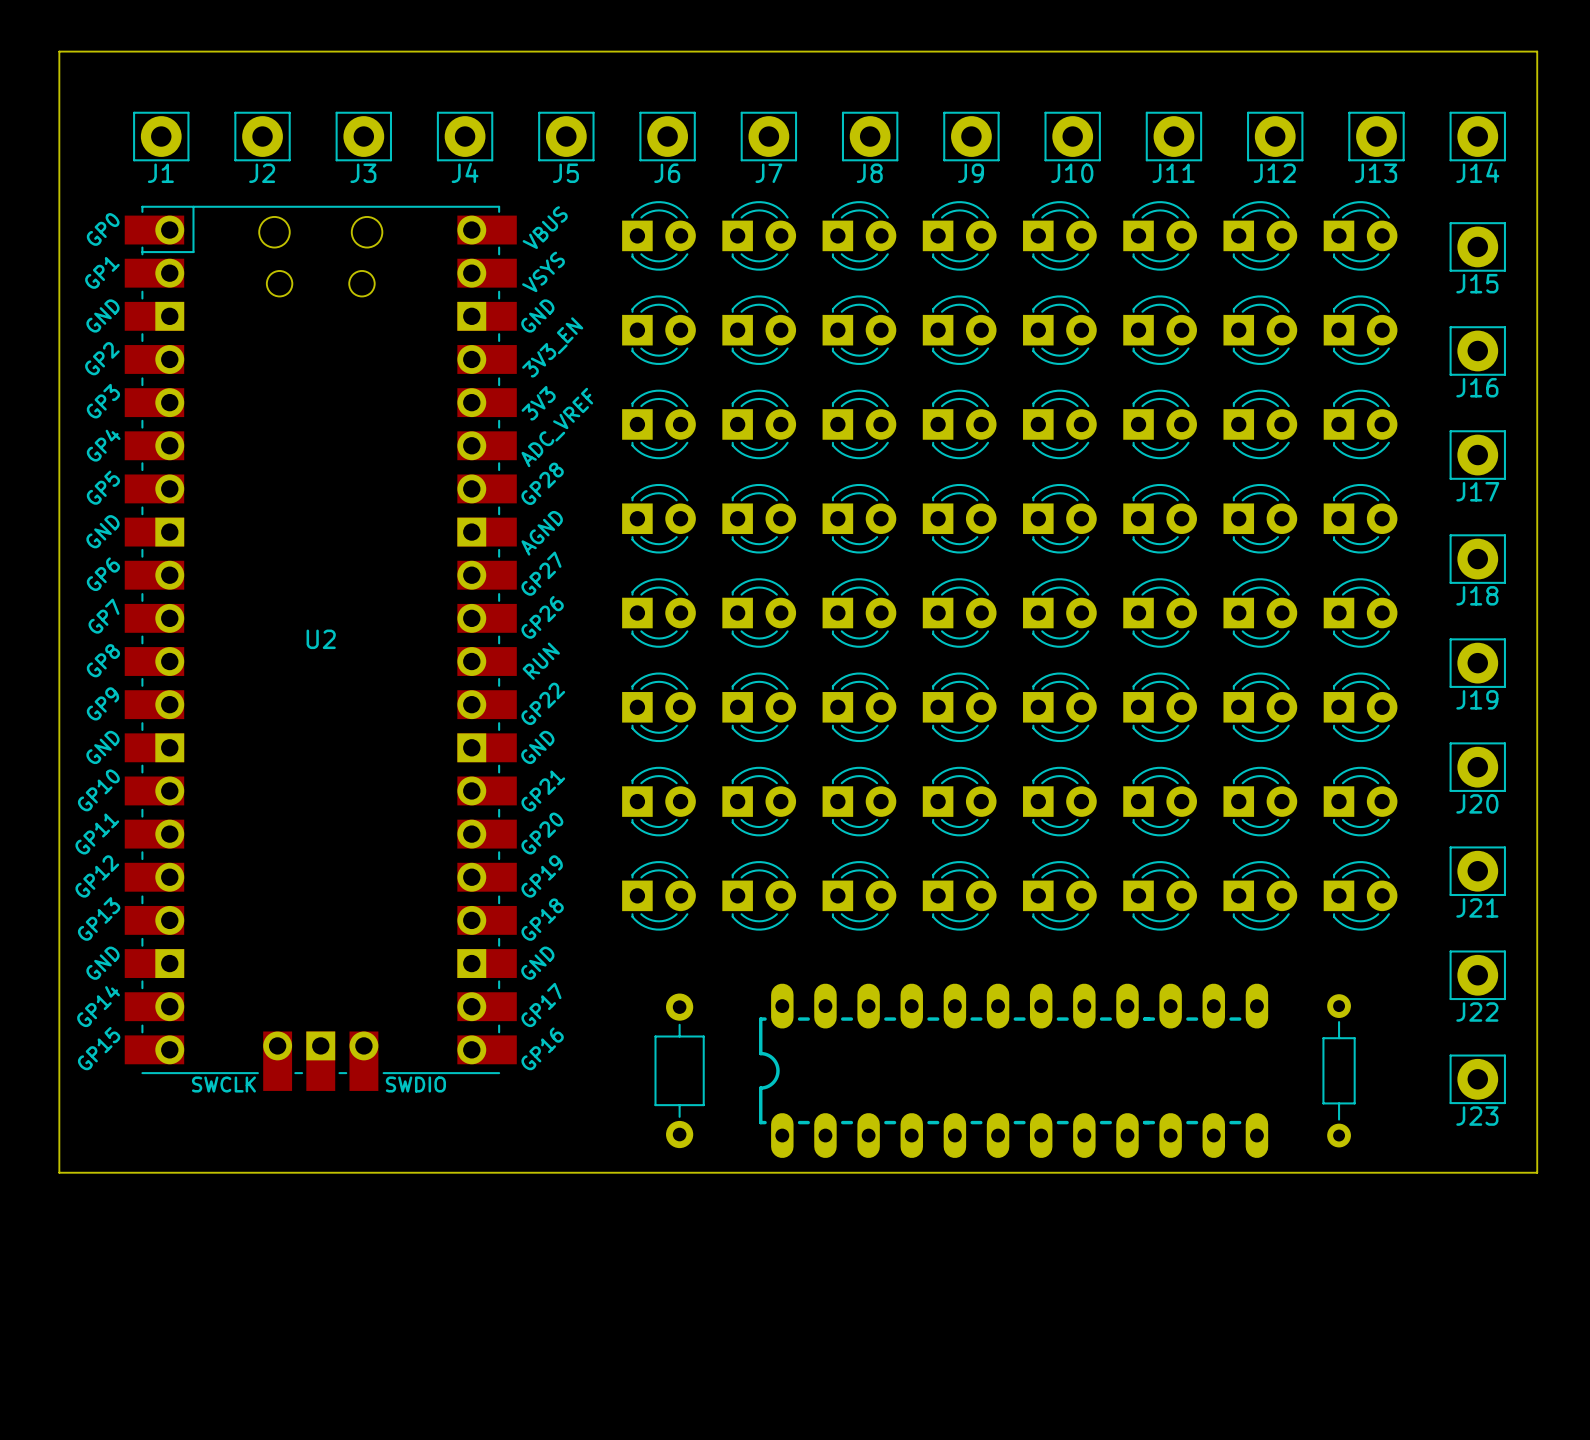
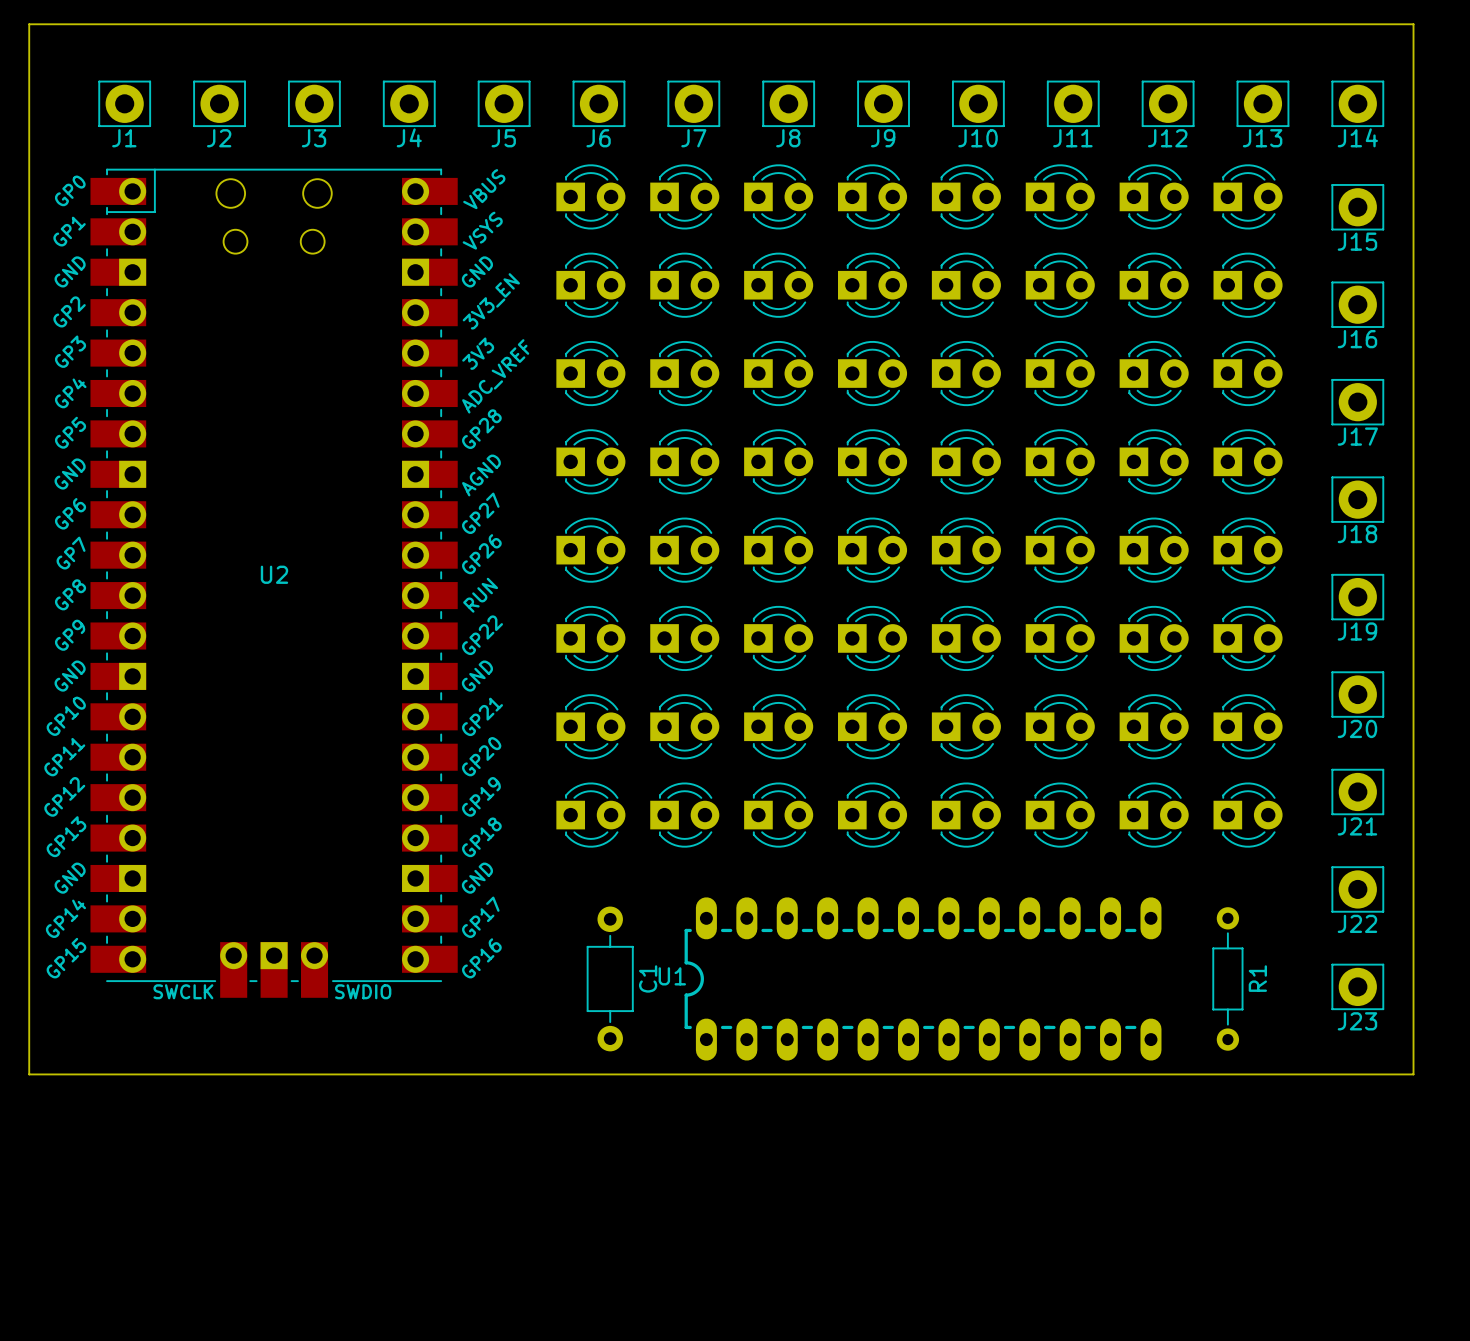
U1 name: none -> U1 (672, 976)
C1 name: none -> C1 (648, 978)
R1 name: none -> R1 (1257, 978)

